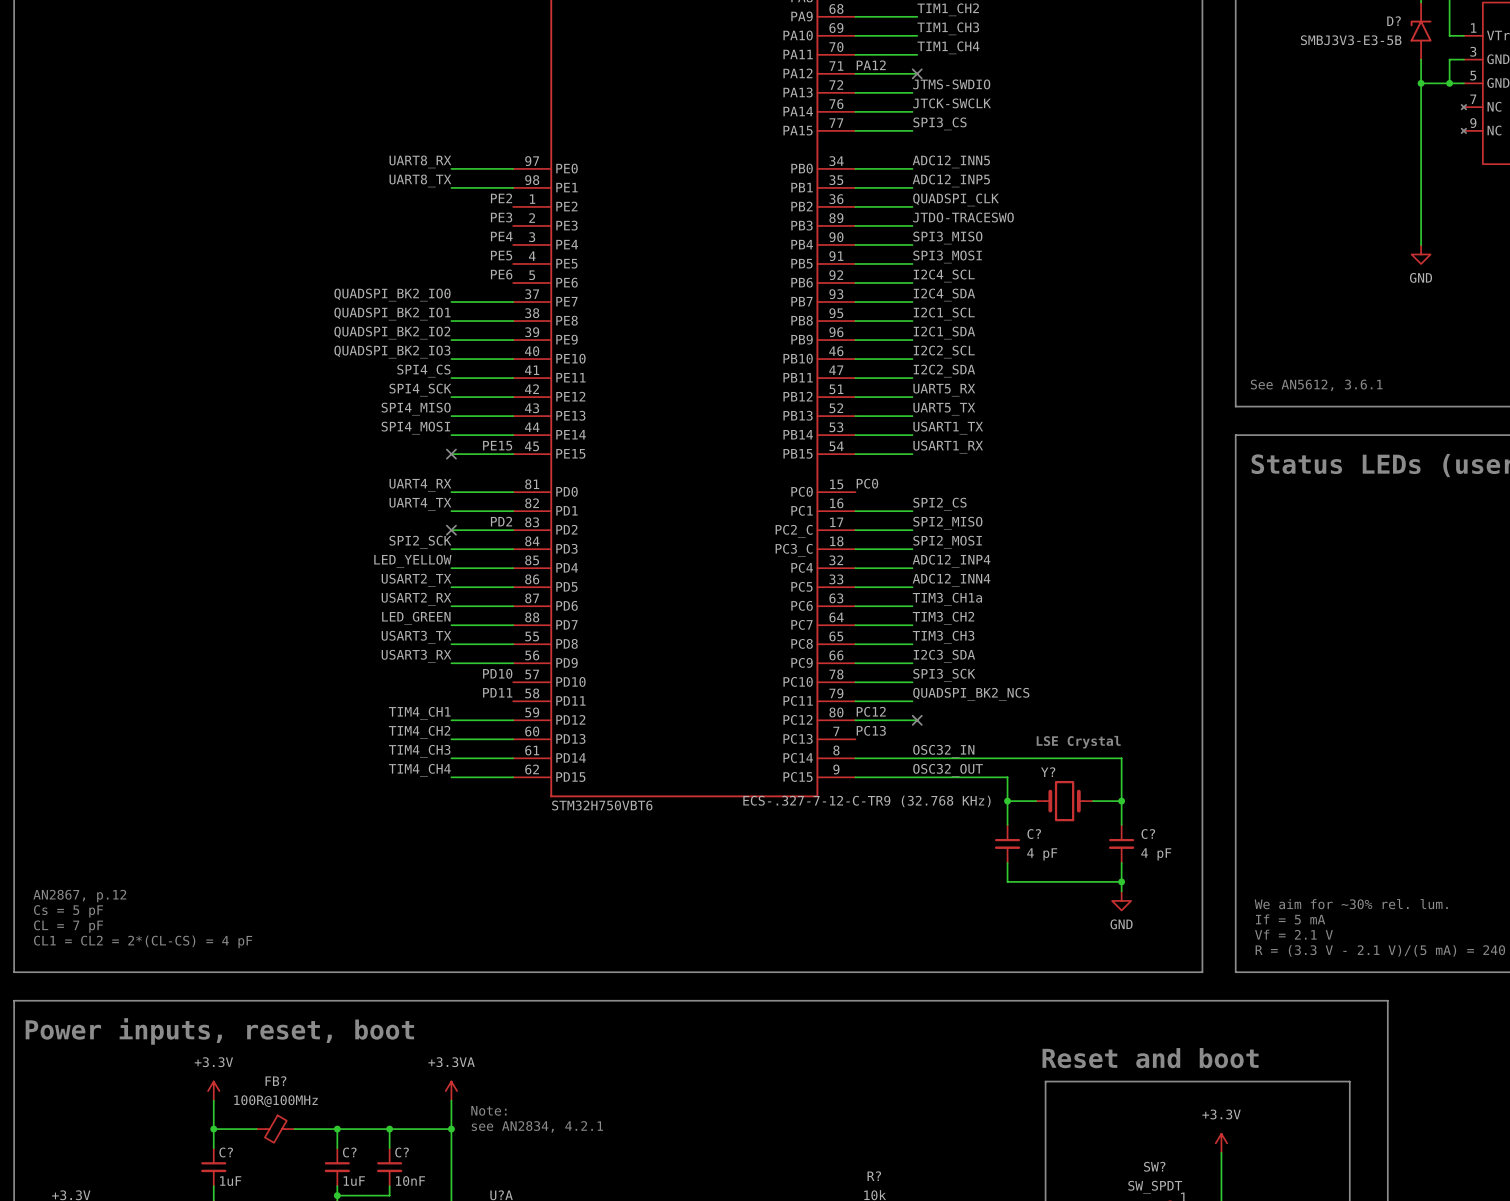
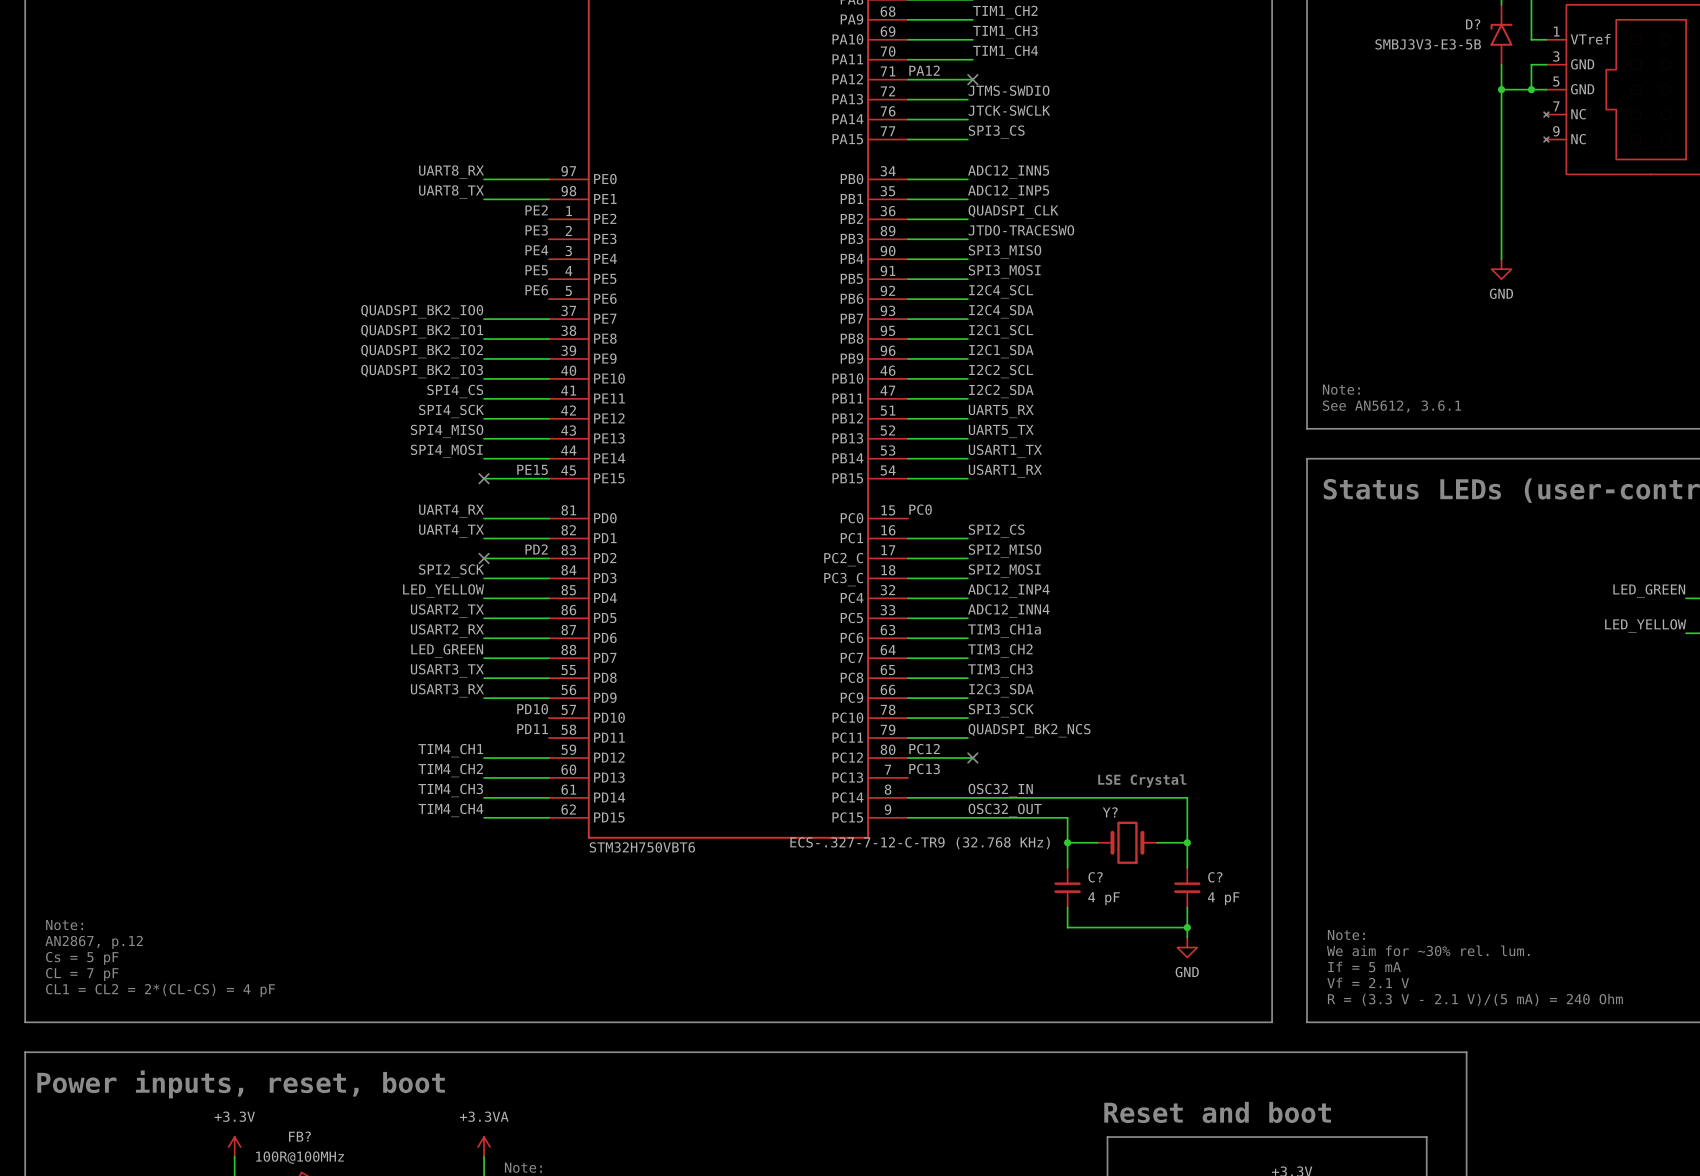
text: none -> Note: (1341, 389)
text: none -> Note: (64, 925)
text: none -> Note: (1346, 935)

